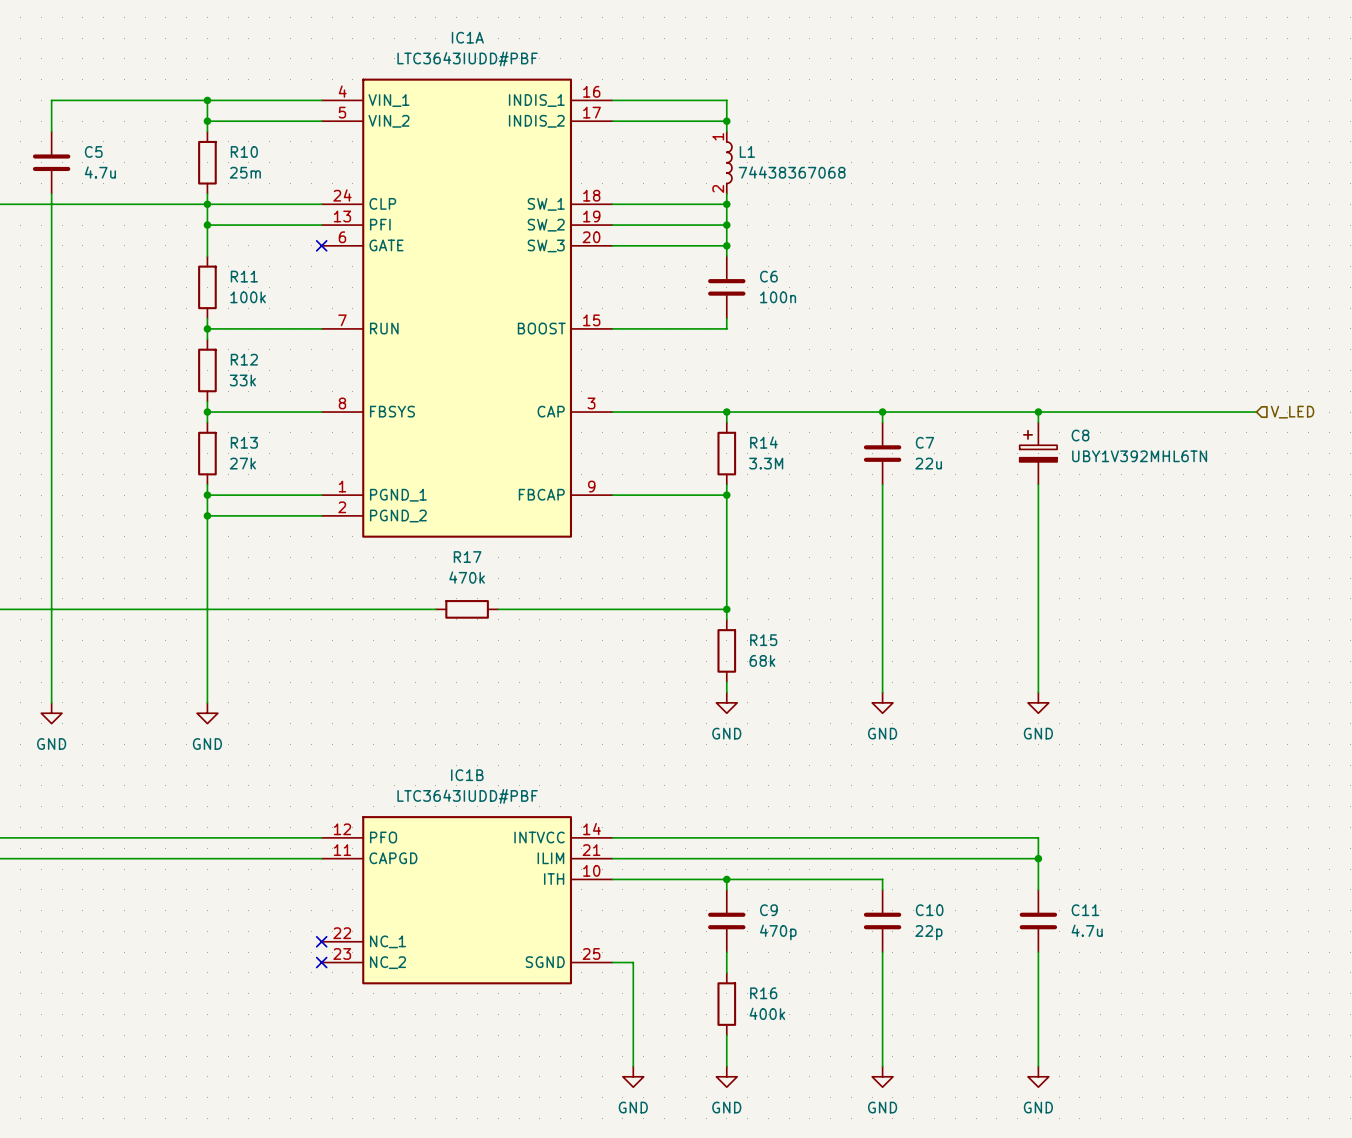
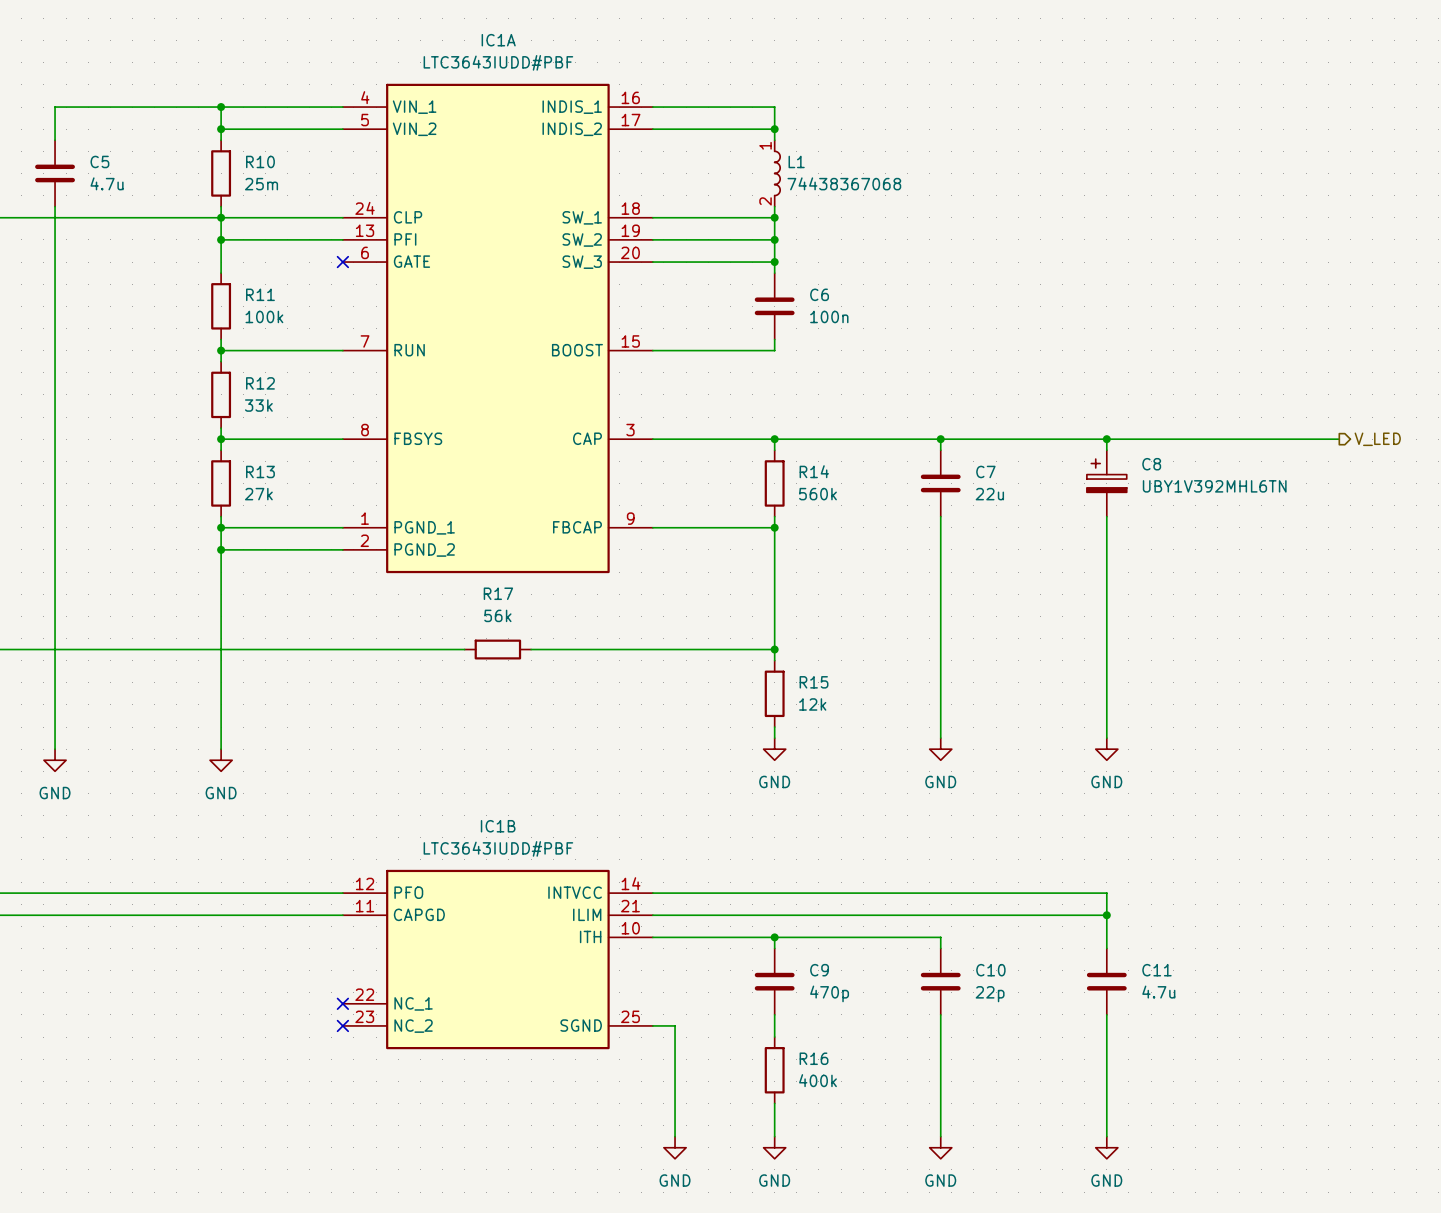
hierarchical label shape: input (1292, 412) -> output (1377, 439)
R14 value: 3.3M (766, 463) -> 560k (817, 494)
R17 value: 470k (467, 577) -> 56k (497, 615)
R15 value: 68k (762, 660) -> 12k (812, 704)

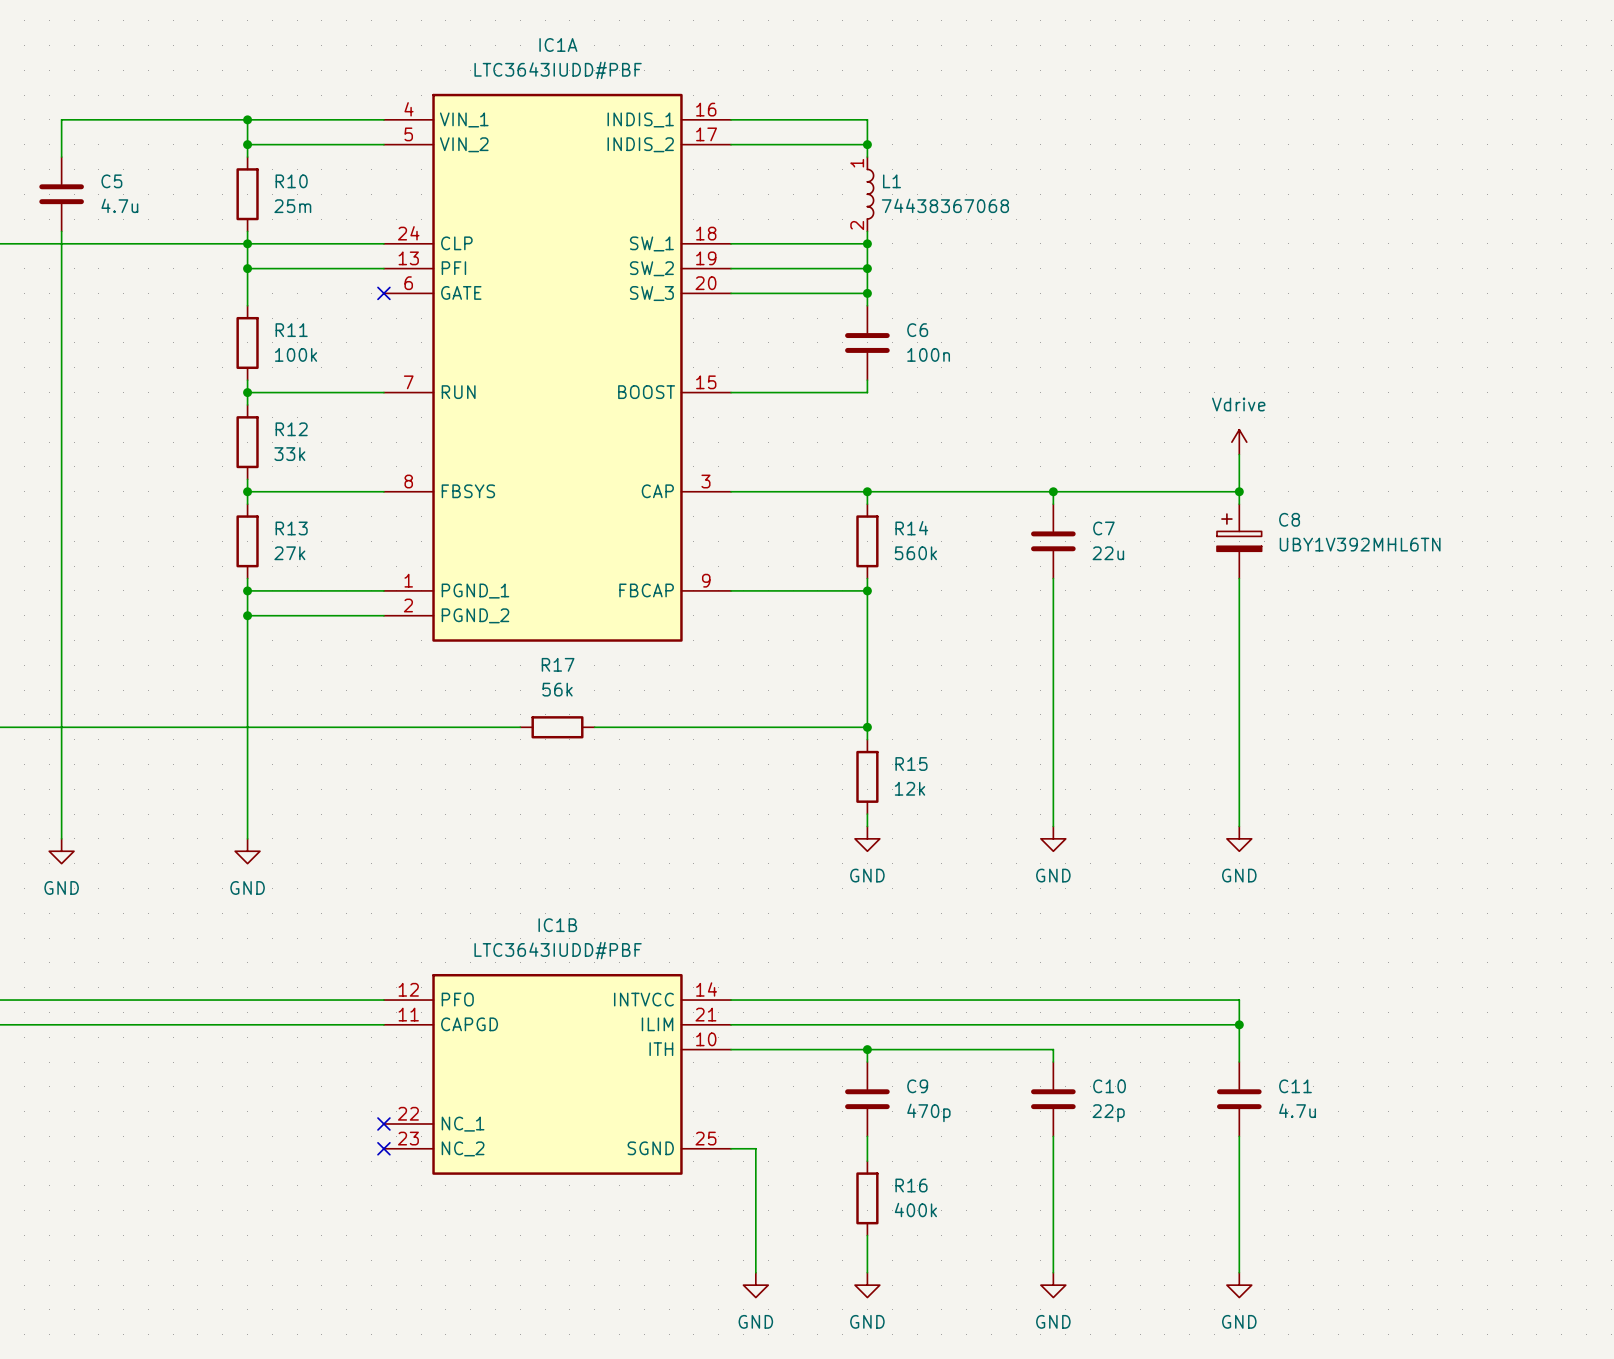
power symbol: none -> Vdrive (1239, 442)
wire: (1106, 439) (1339, 439) -> (1239, 491) (1239, 454)
hierarchical label: V_LED (1377, 439) -> none

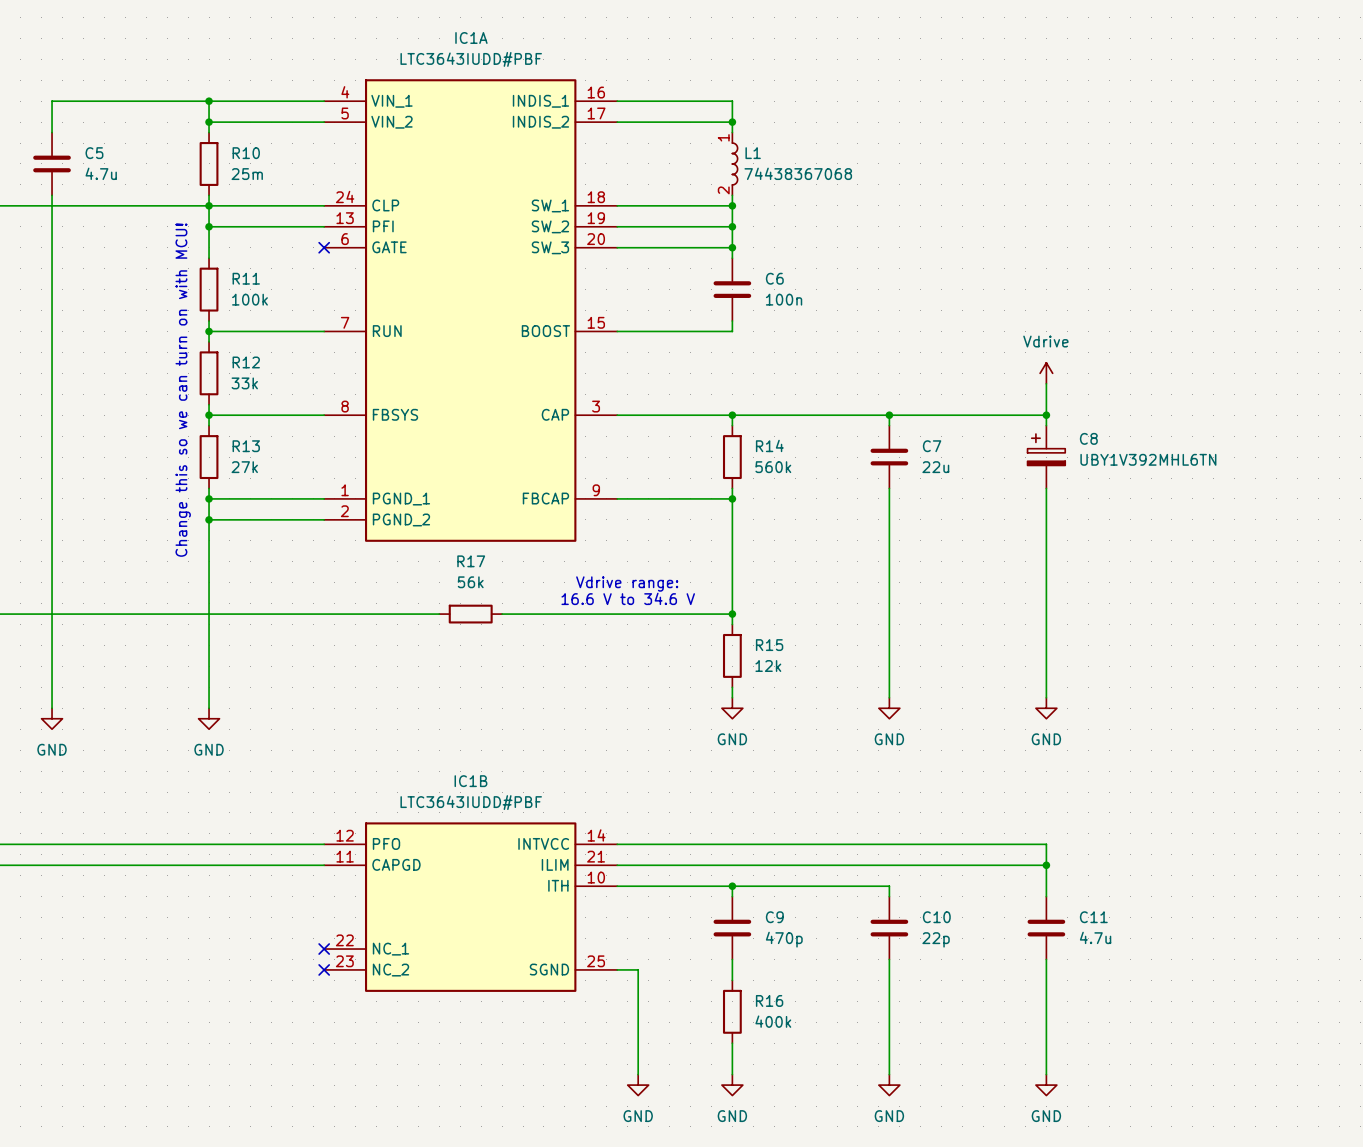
text: none -> Change this so we can turn on with MCU! (183, 390)
text: none -> Vdrive range: (627, 584)
text: none -> 16.6 V to 34.6 V (628, 598)

